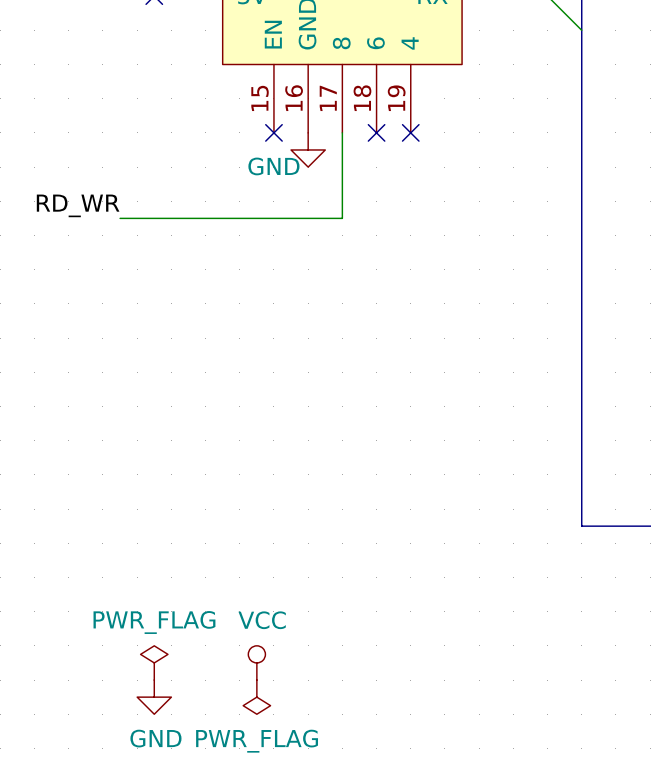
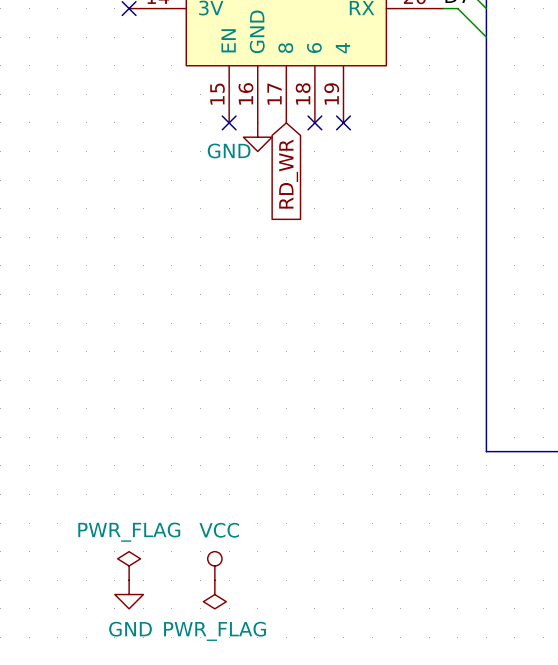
wire: (342, 132) (342, 218) (120, 218) -> none
global label: none -> RD_WR (288, 174)
label: RD_WR (78, 205) -> none

